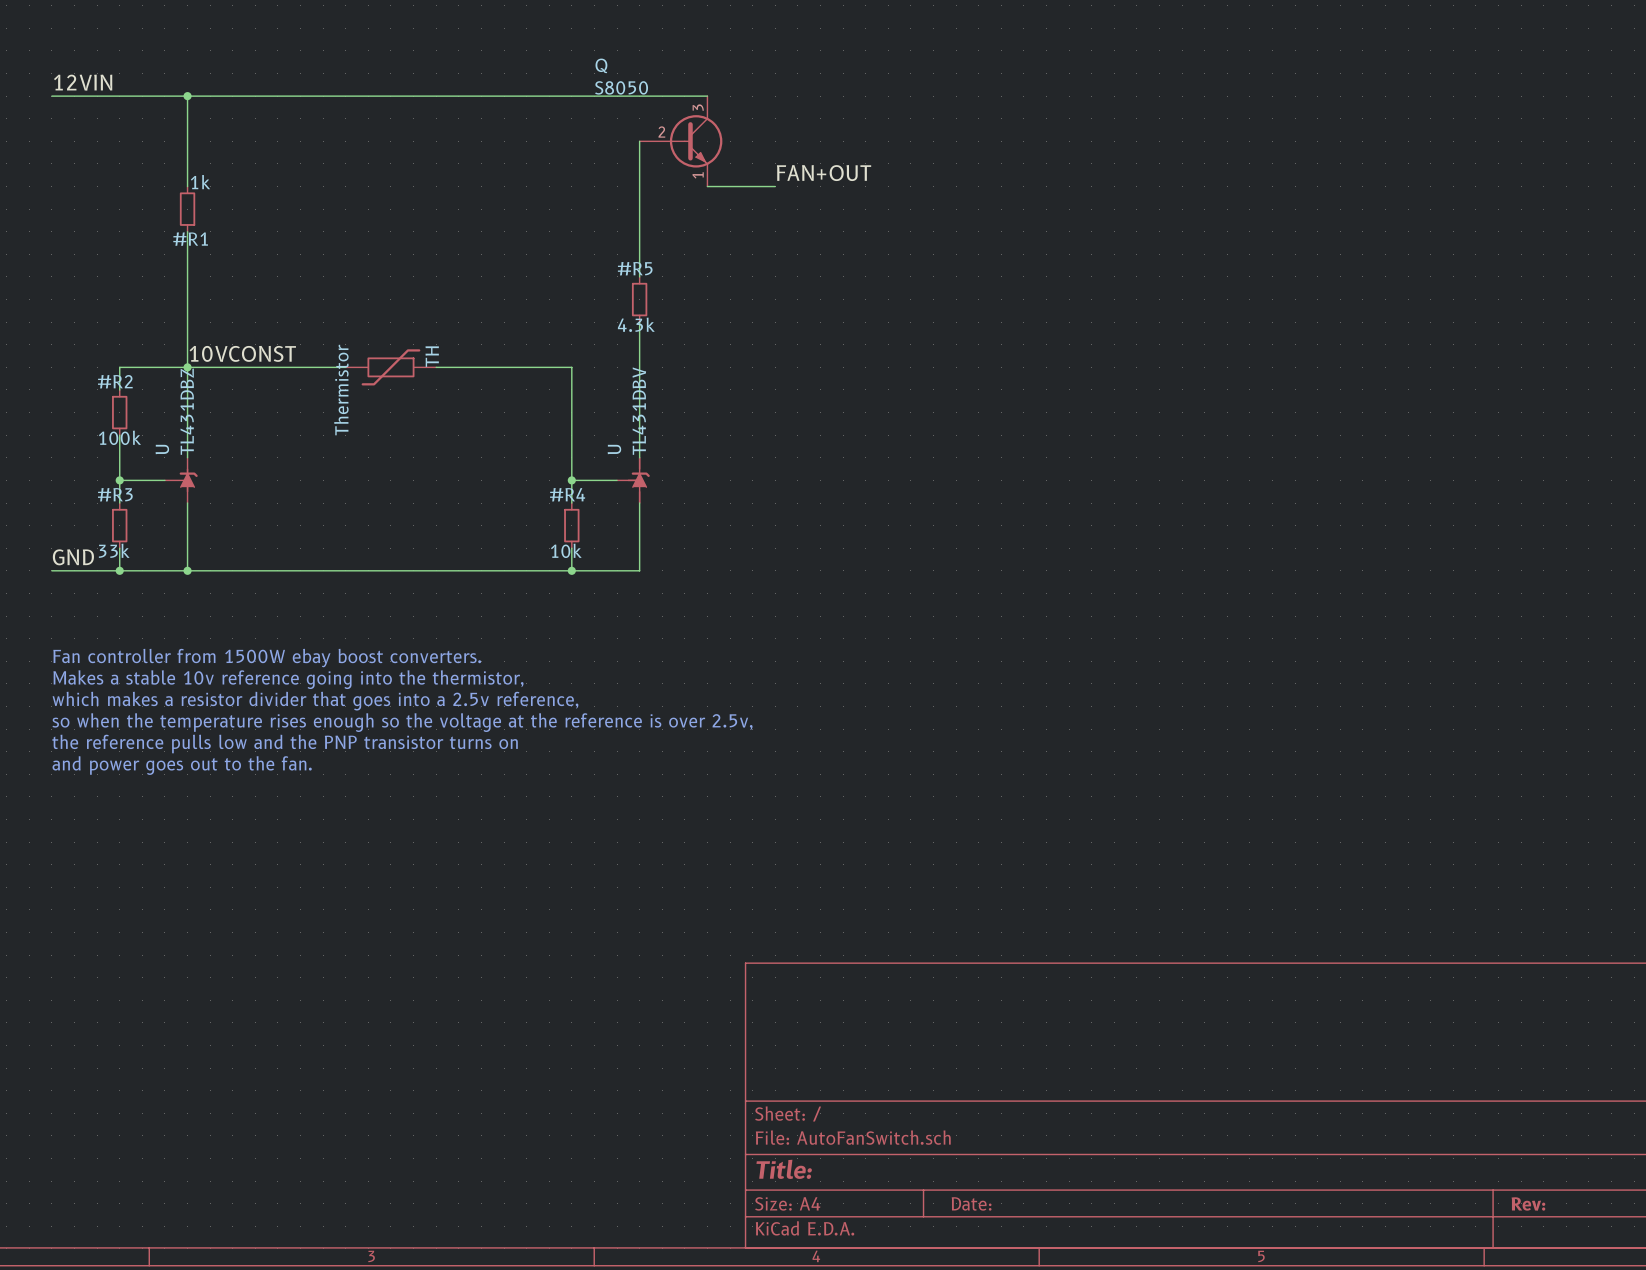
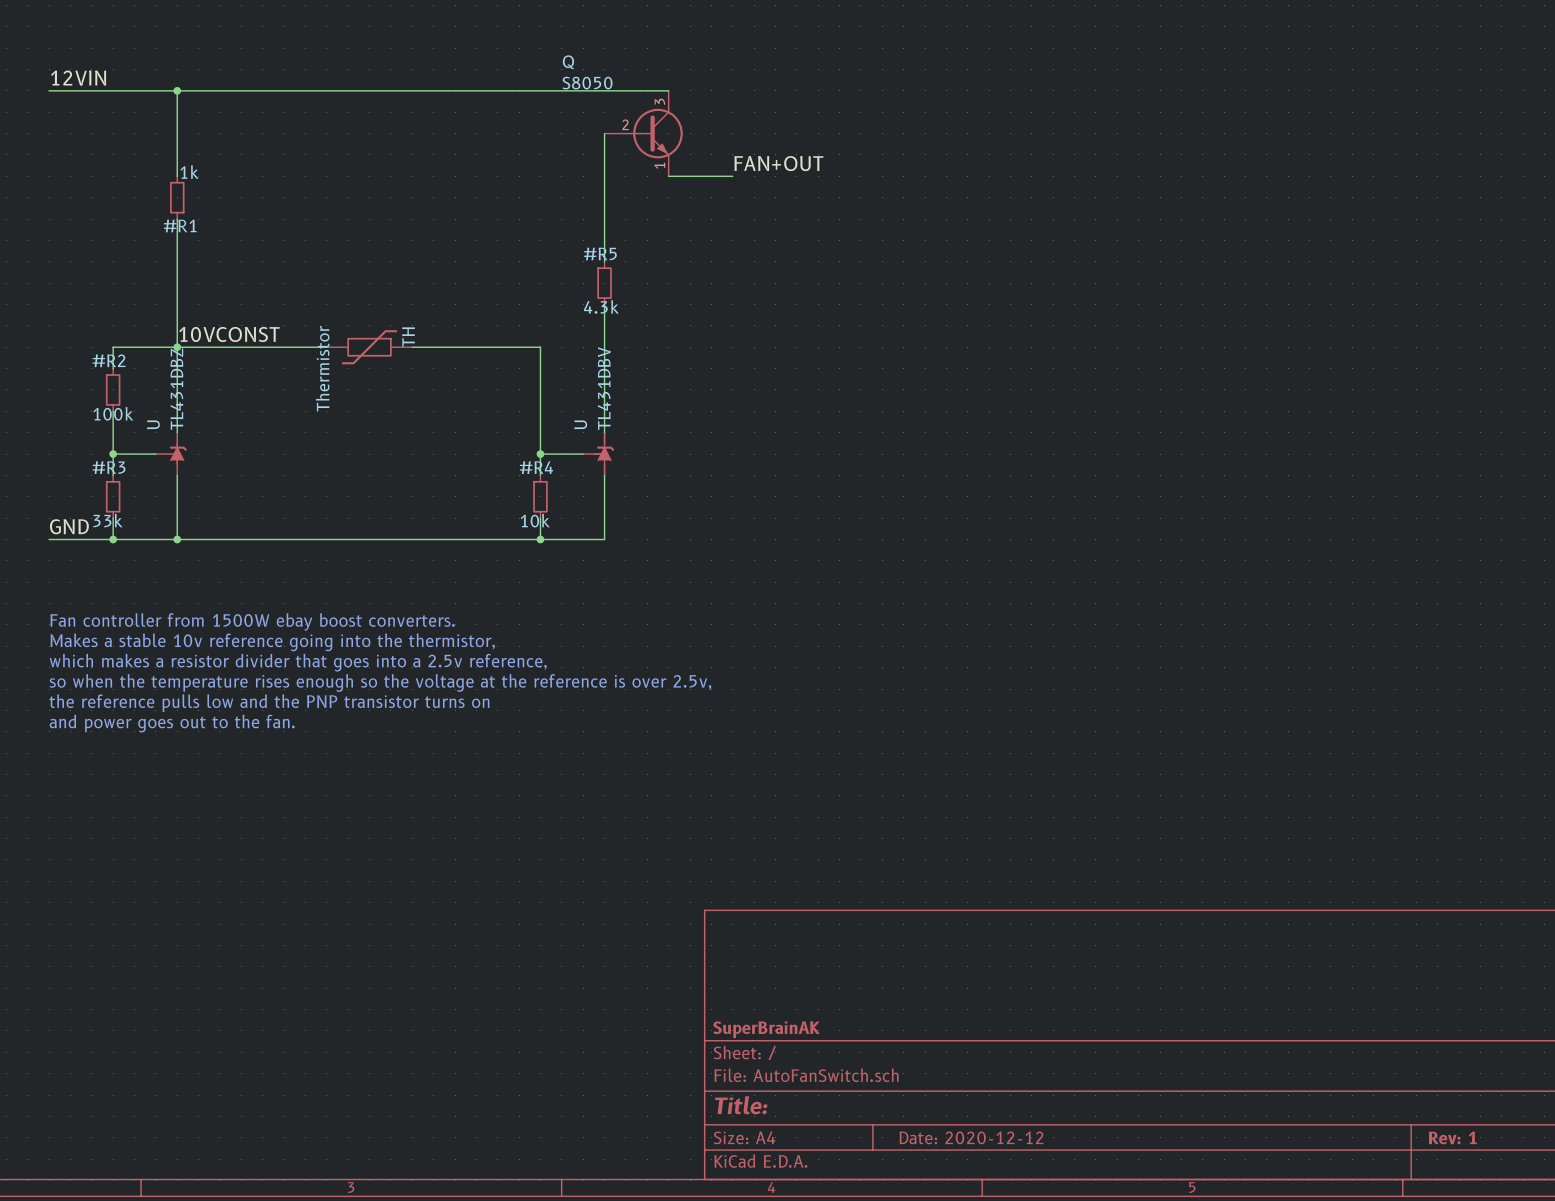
title block: none -> SuperBrainAK (766, 1029)
title block: Date: (971, 1203) -> Date: 2020-12-12 (971, 1137)
title block: Rev: (1528, 1204) -> Rev: 1 (1452, 1137)

